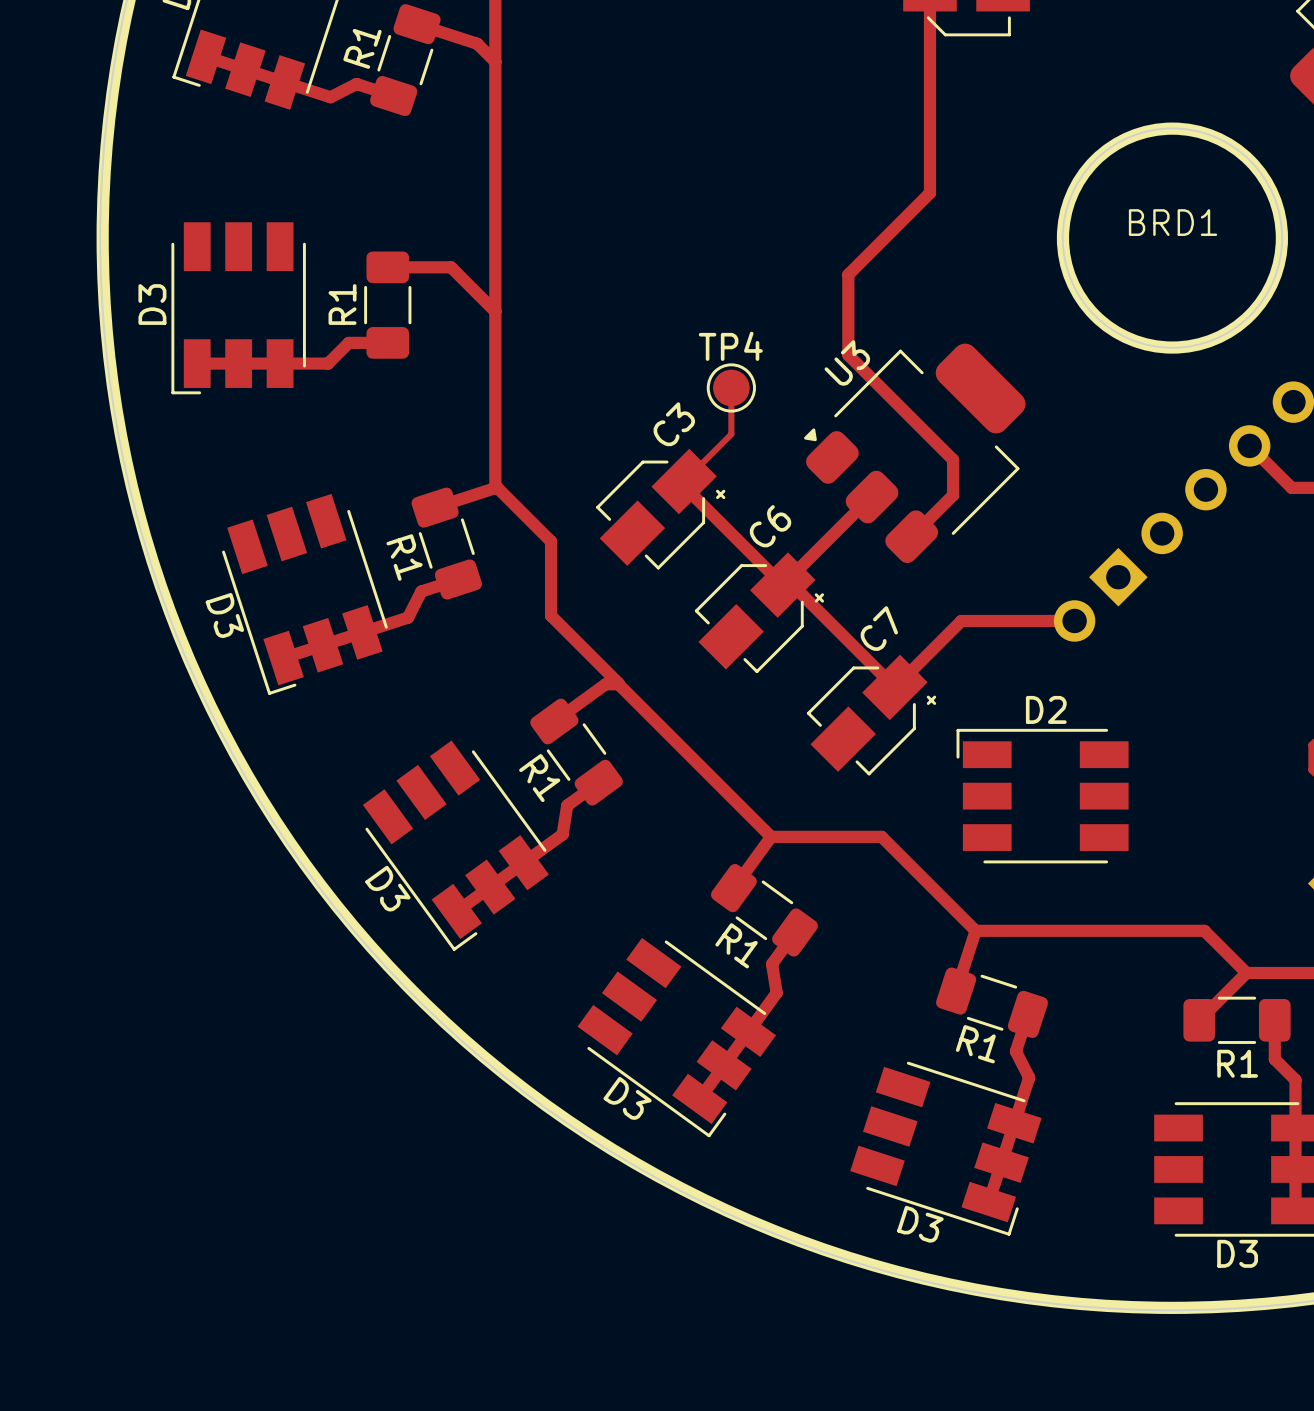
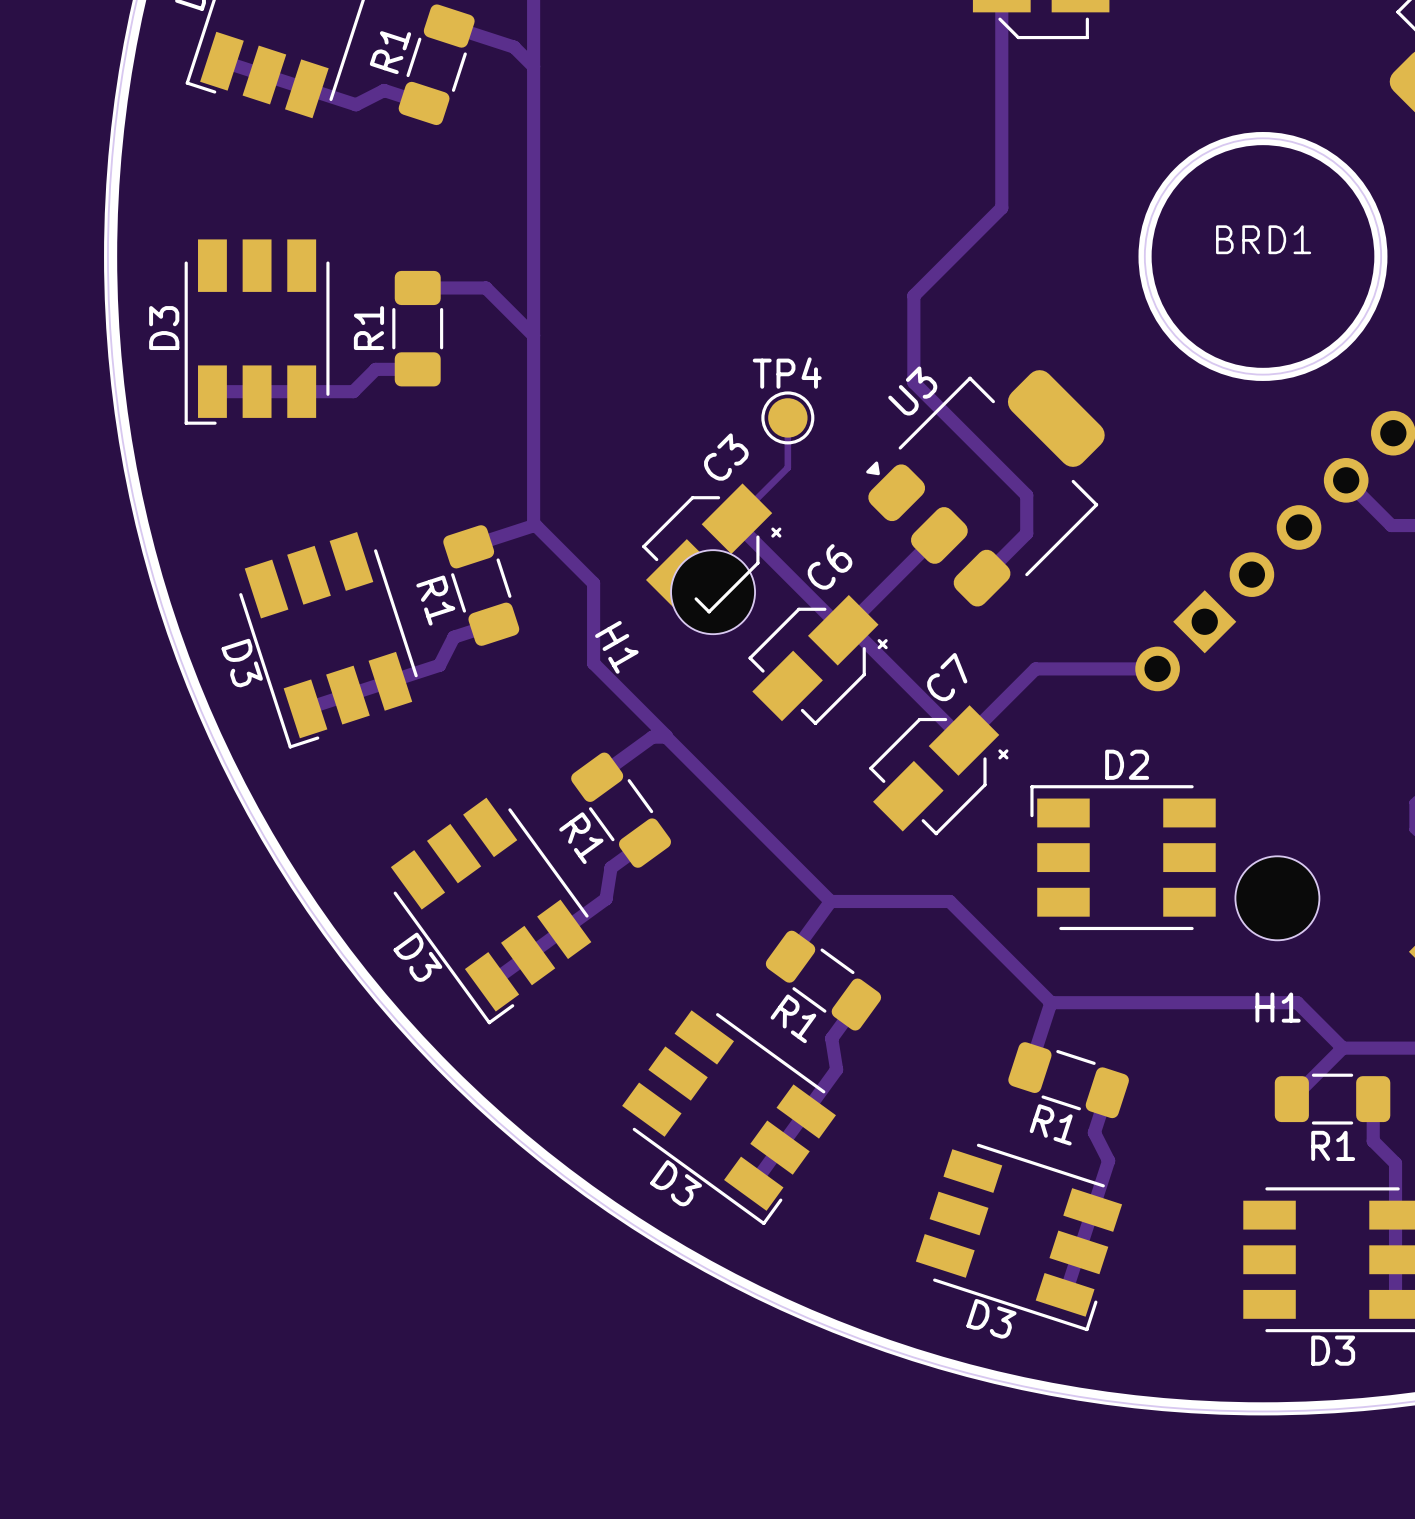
H1: none -> (713, 592)
H1: none -> (1277, 898)

